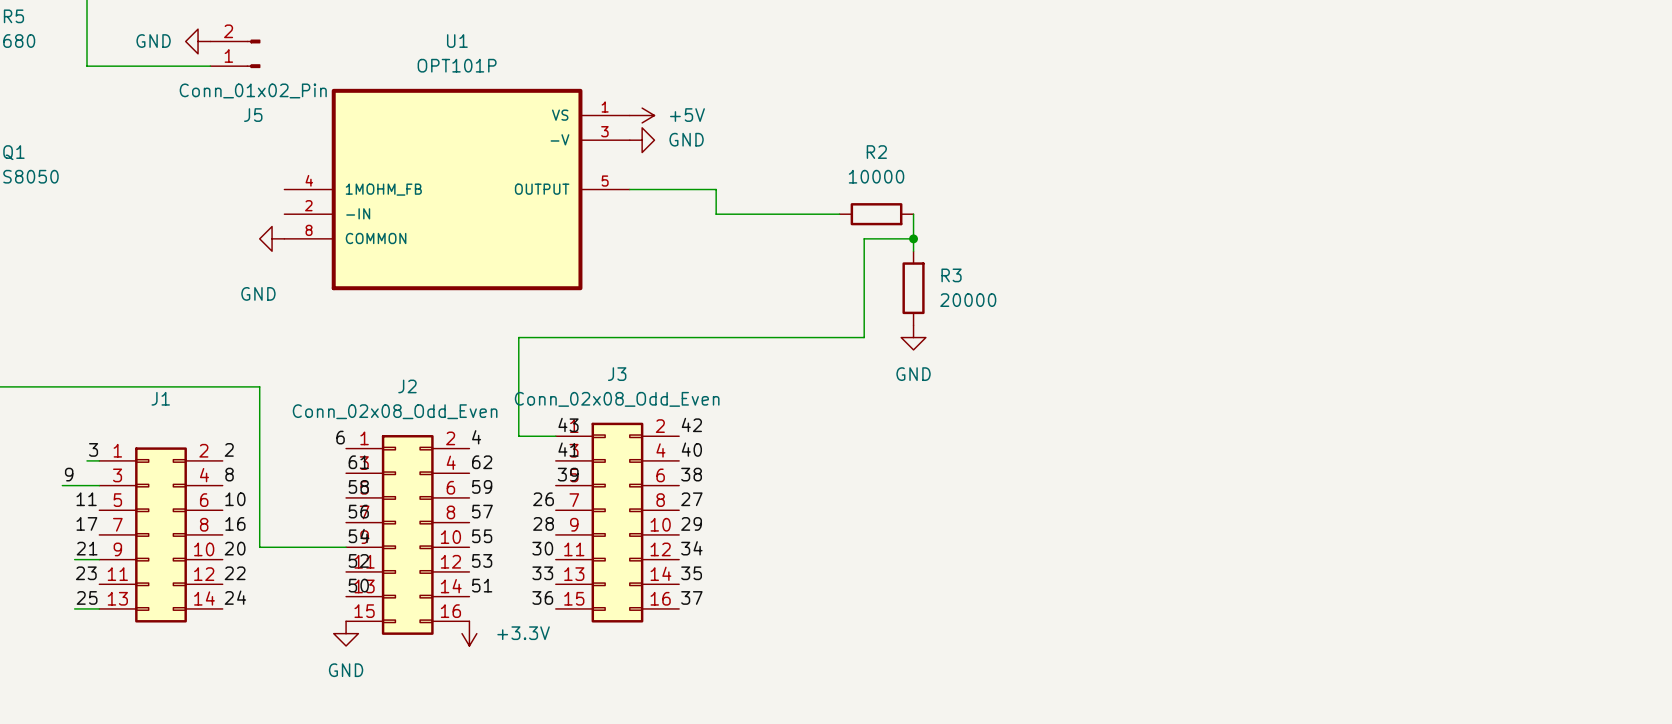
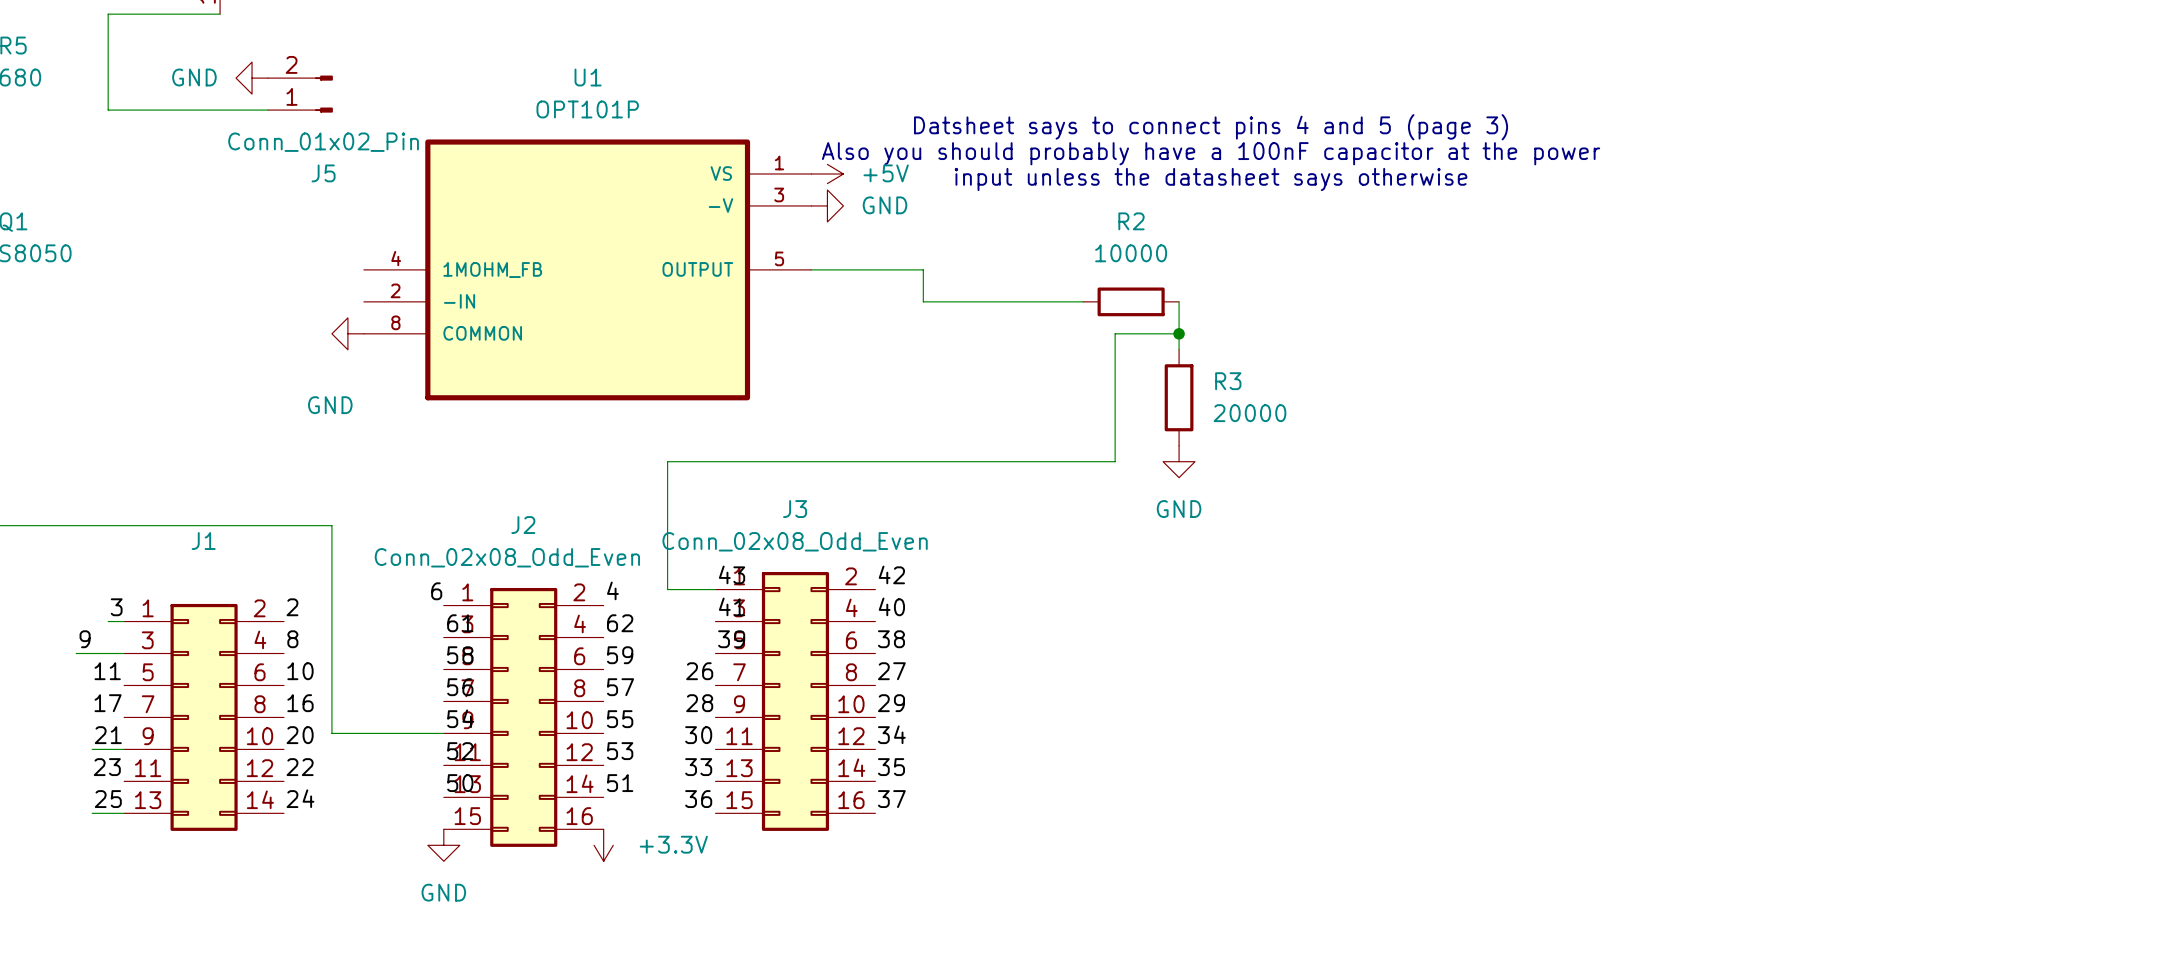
text: none -> Datsheet says to connect pins 4 and 5 (page 3) (1211, 127)
text: none -> Also you should probably have a 100nF capacitor at the power (1211, 153)
text: none -> input unless the datasheet says otherwise (1211, 179)

